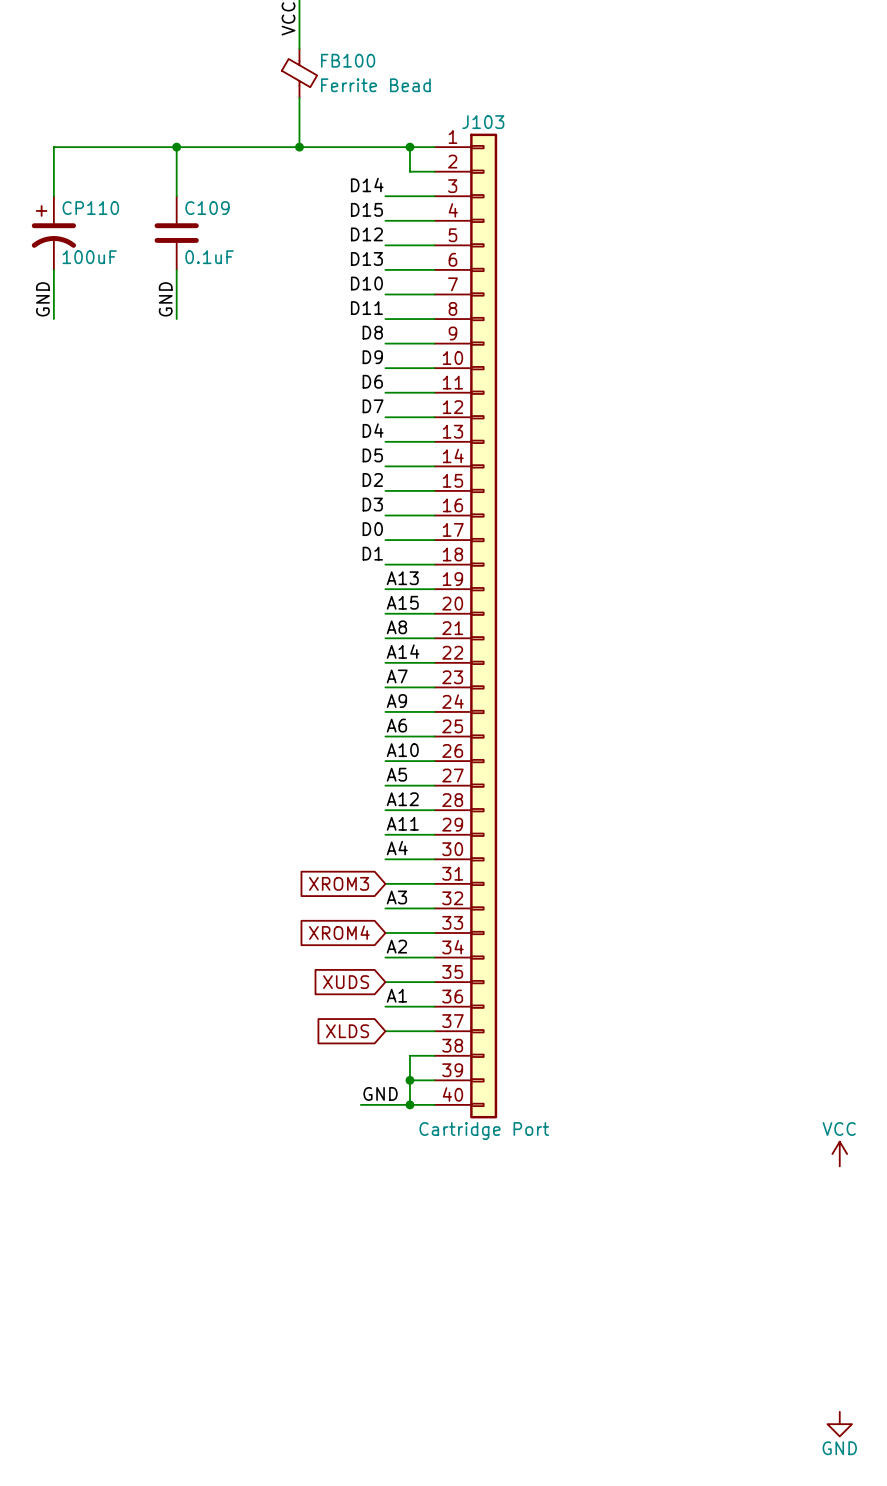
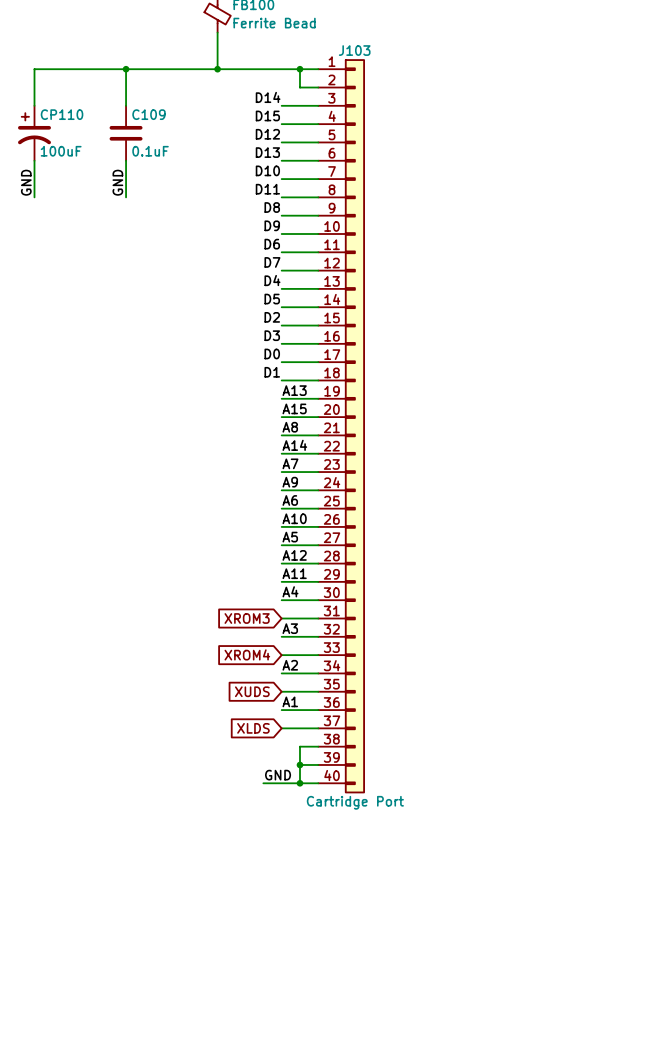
power symbol: VCC (839, 1154) -> none
power symbol: GND (839, 1424) -> none

